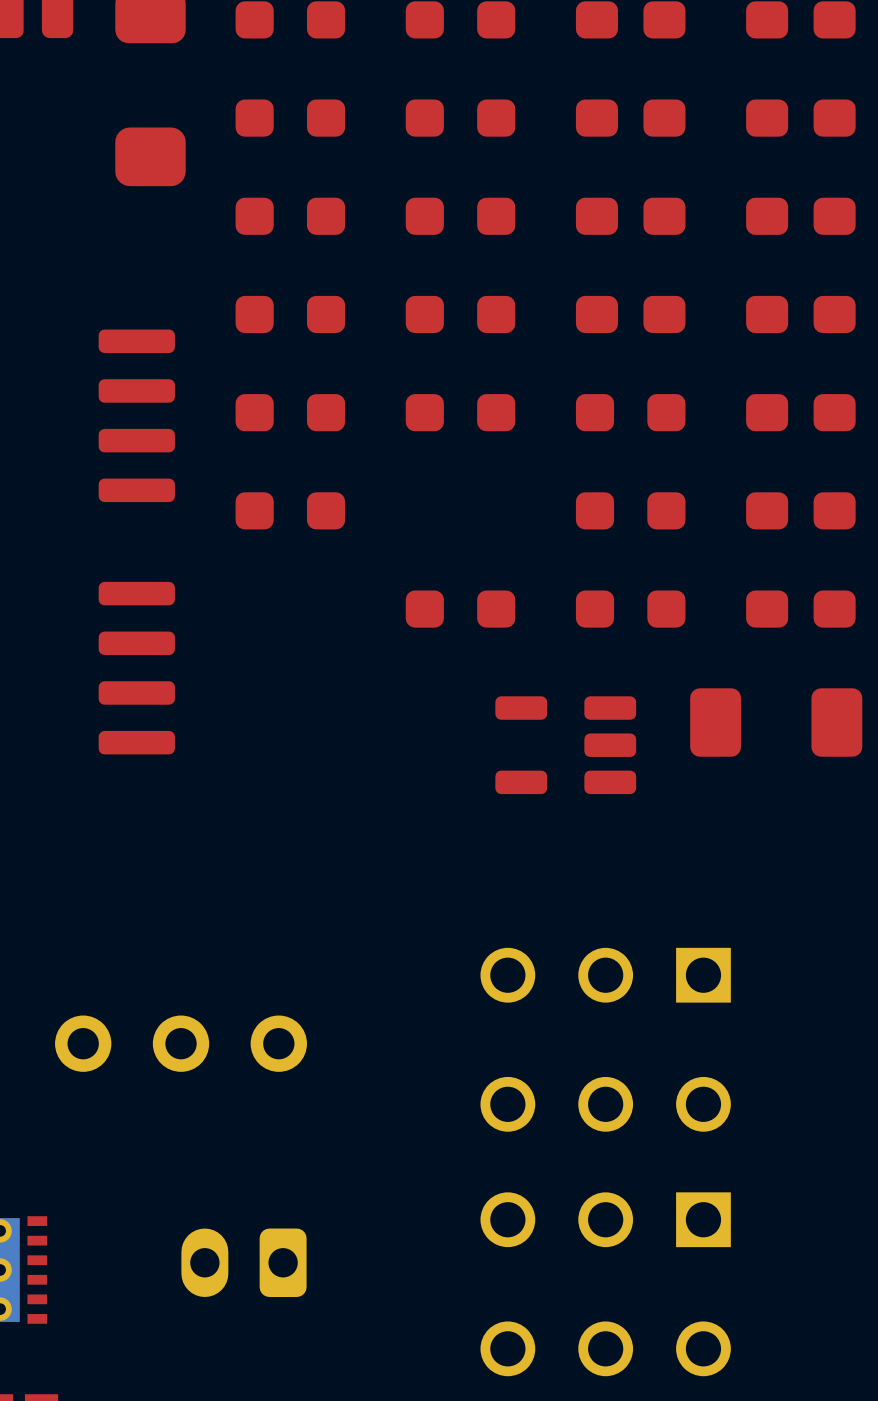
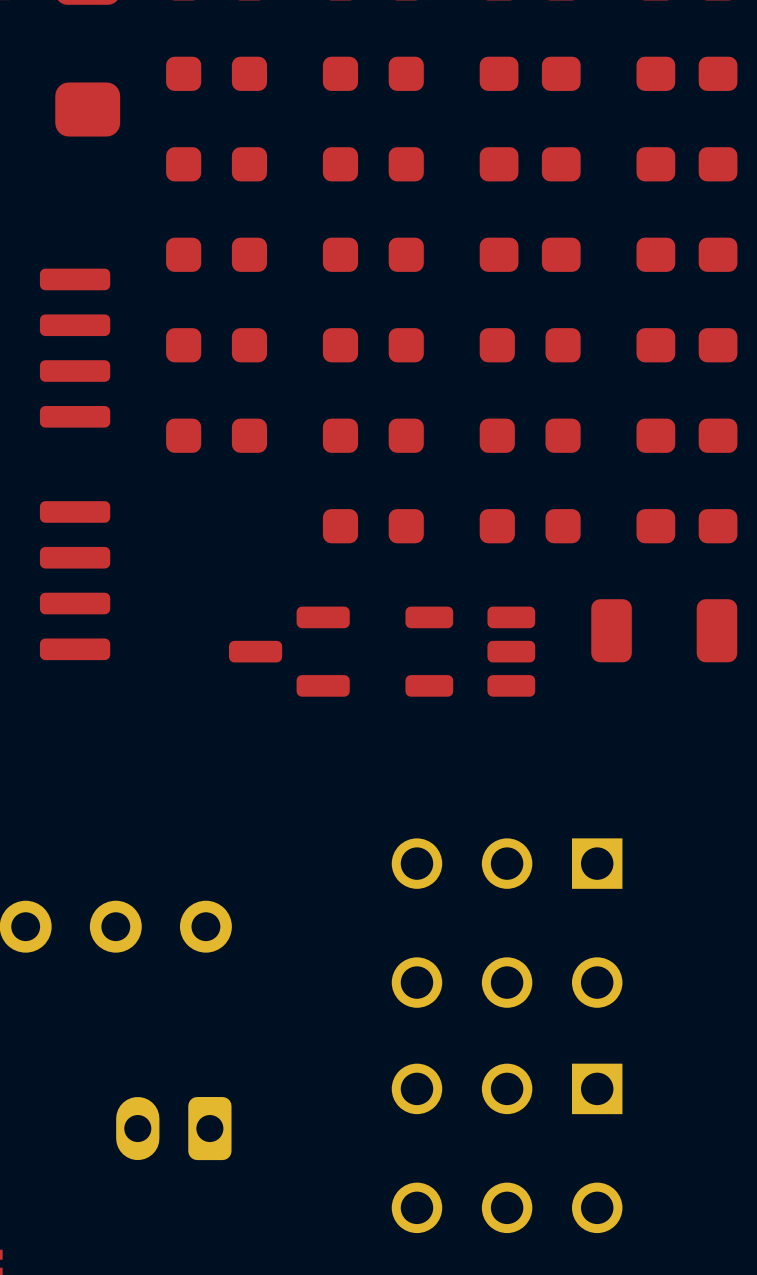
part: none -> (373, 435)
part footprint: [690, 688, 863, 757] -> [591, 599, 738, 663]
part: none -> (289, 651)

